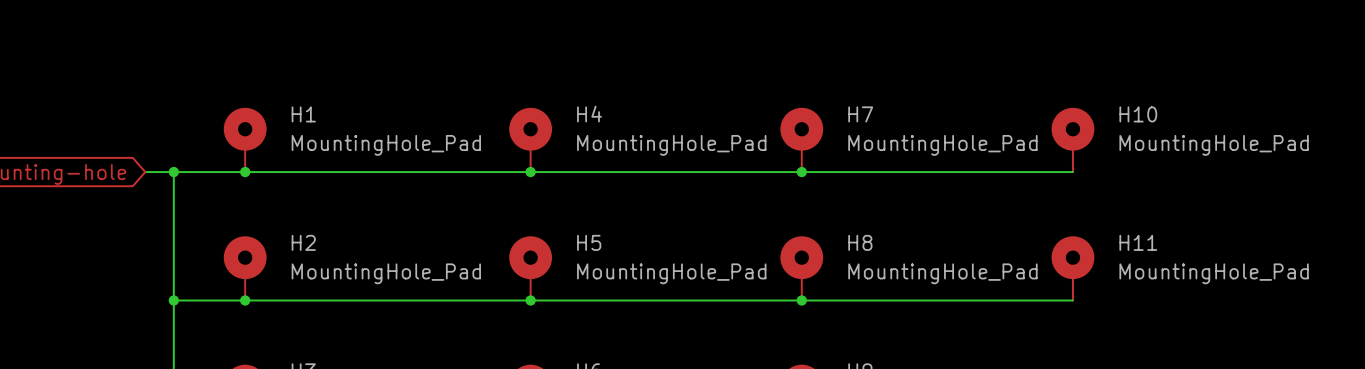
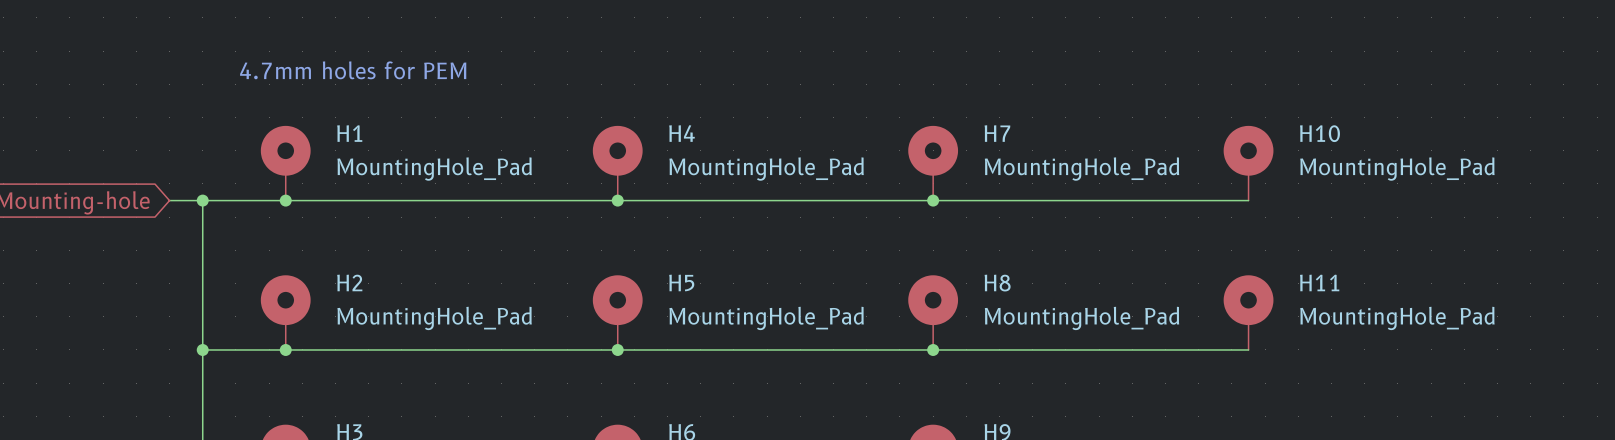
text: none -> 4.7mm holes for PEM (353, 70)

